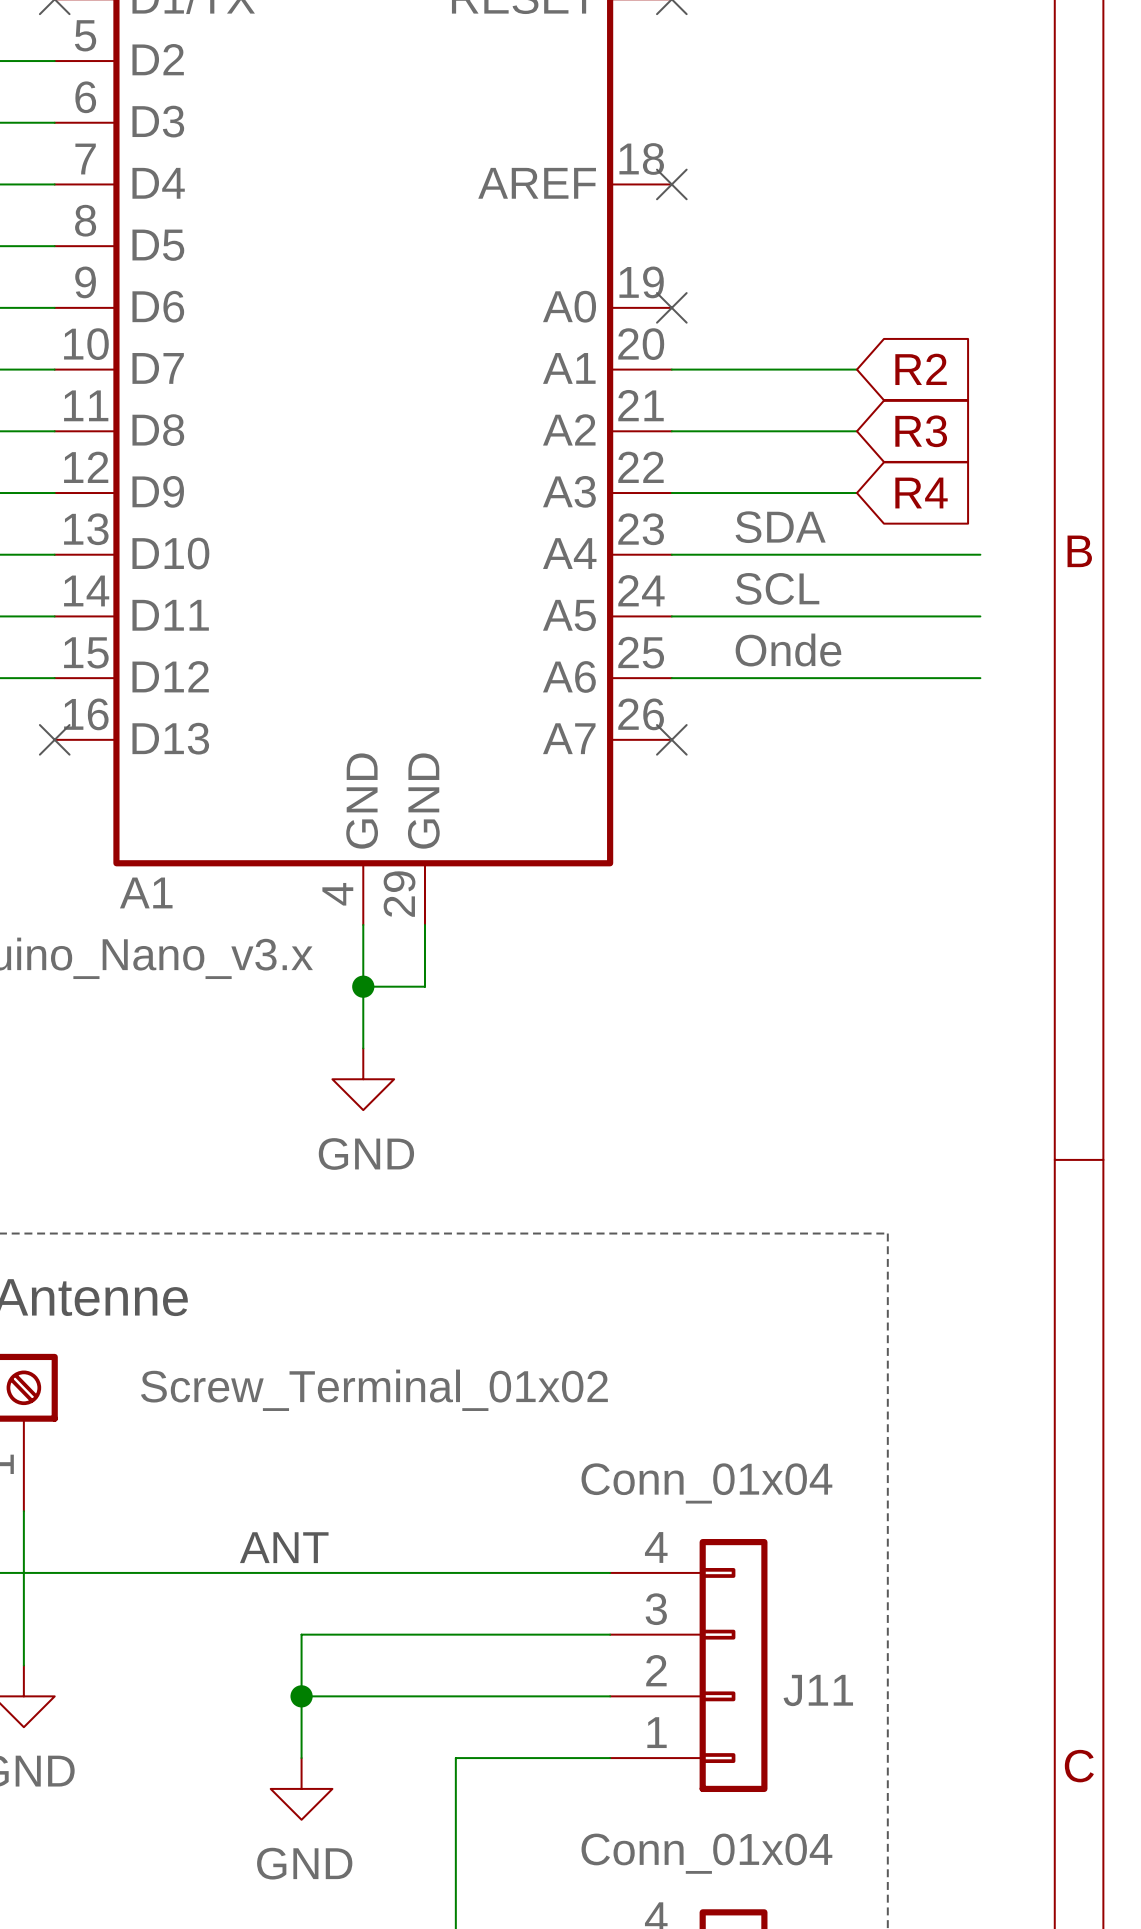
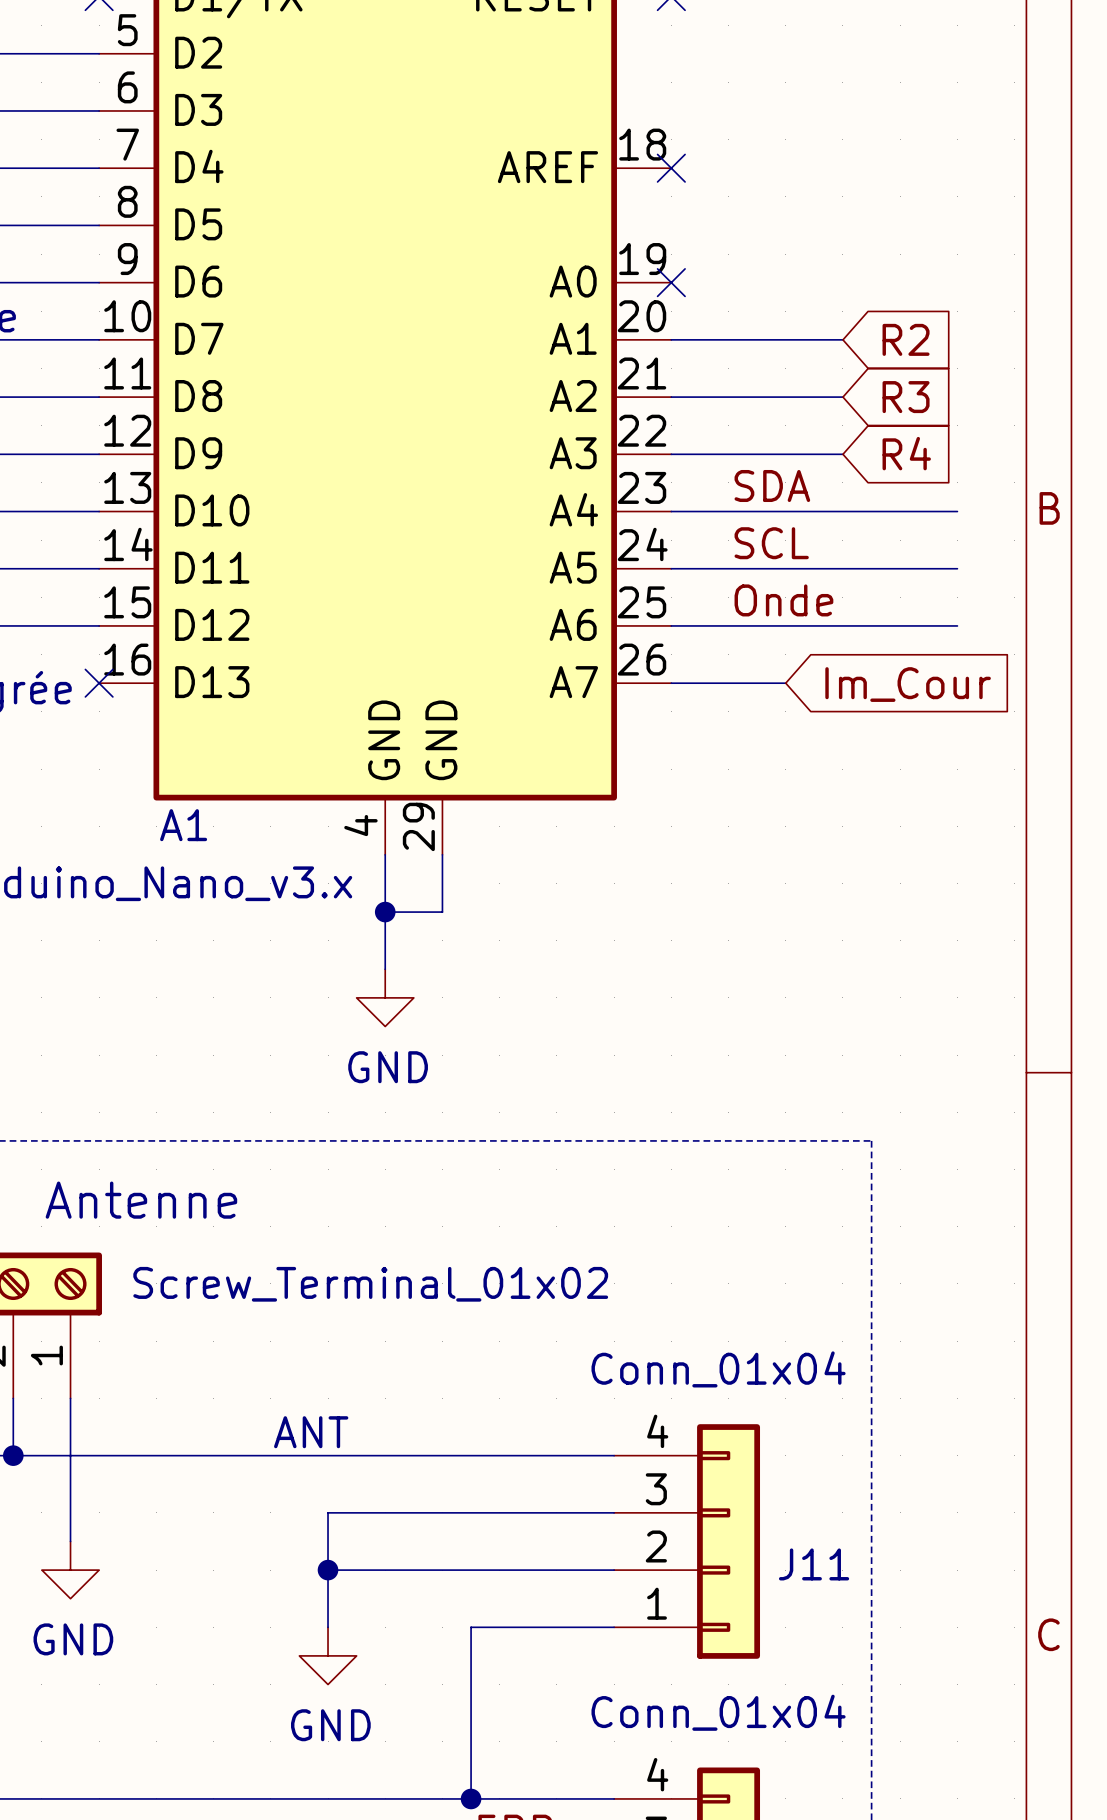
wire: none -> (671, 683) (785, 683)
no-connect mark: (671, 739) -> none
global label: none -> Im_Cour (908, 684)

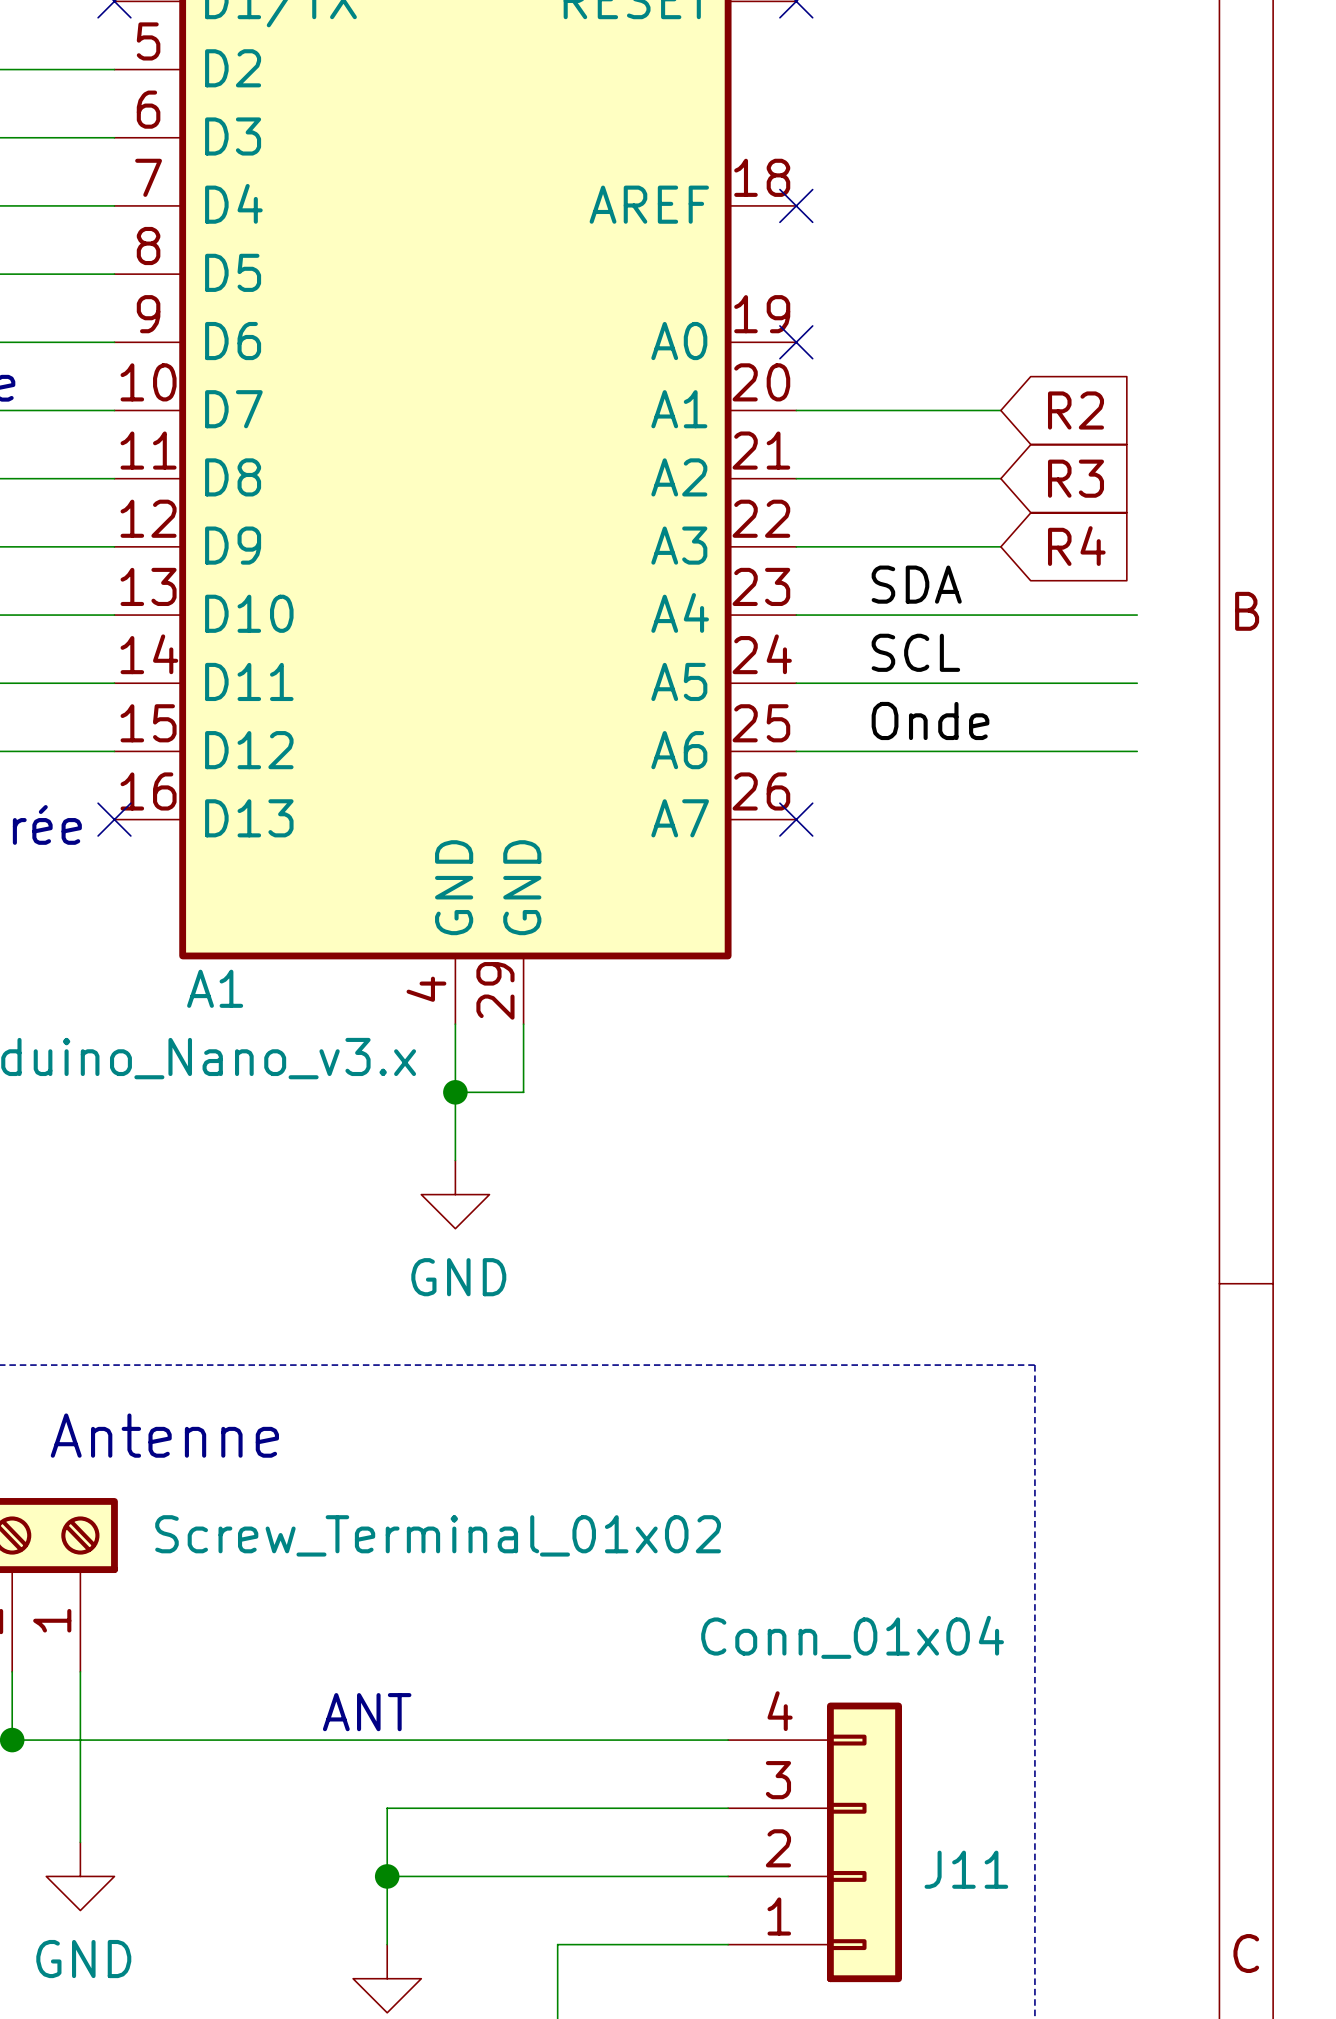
wire: (671, 683) (785, 683) -> none
no-connect mark: none -> (796, 819)
global label: Im_Cour (908, 684) -> none

